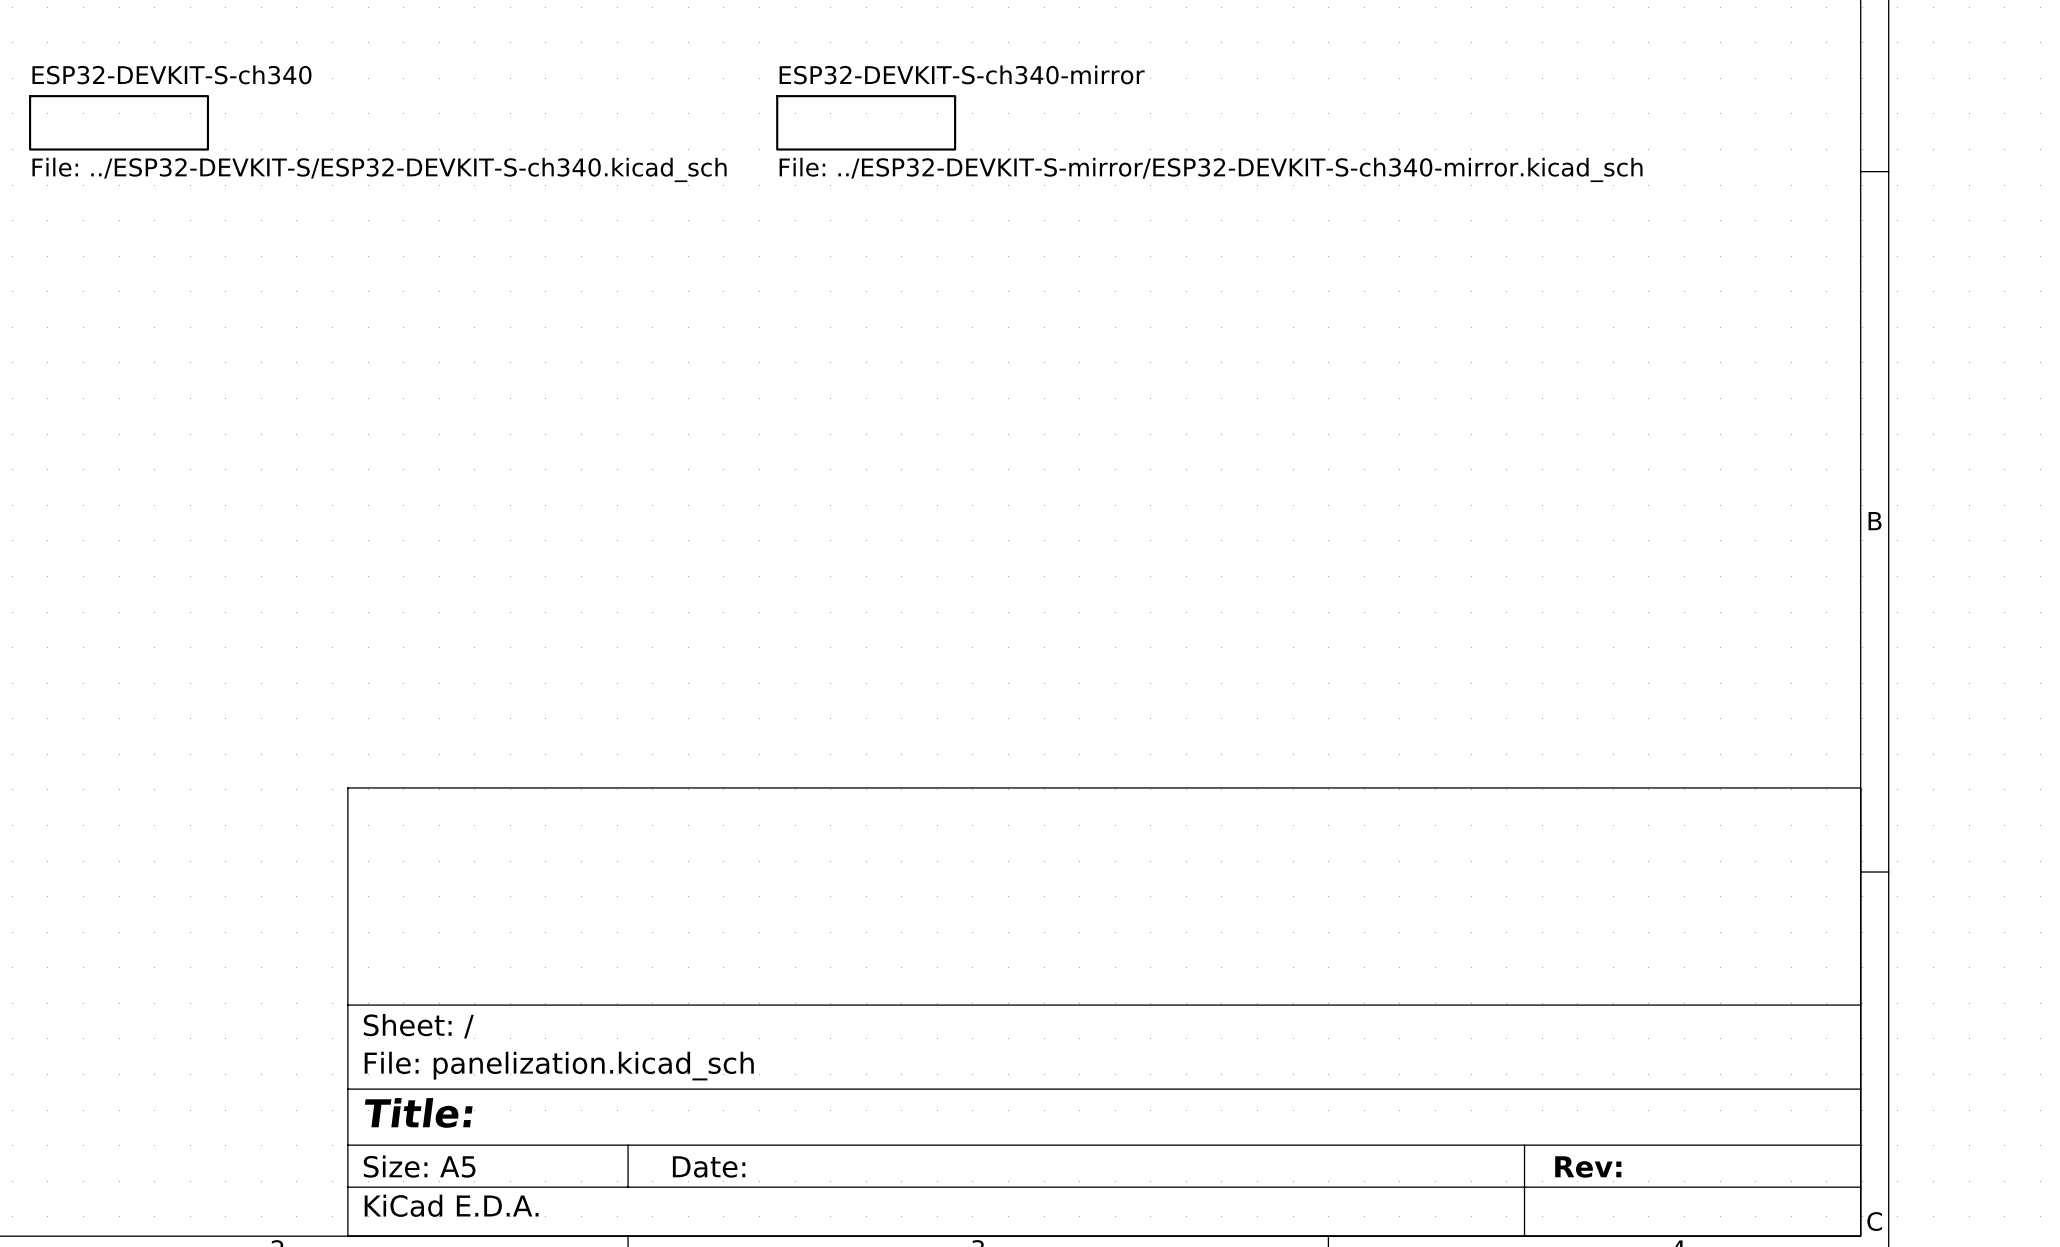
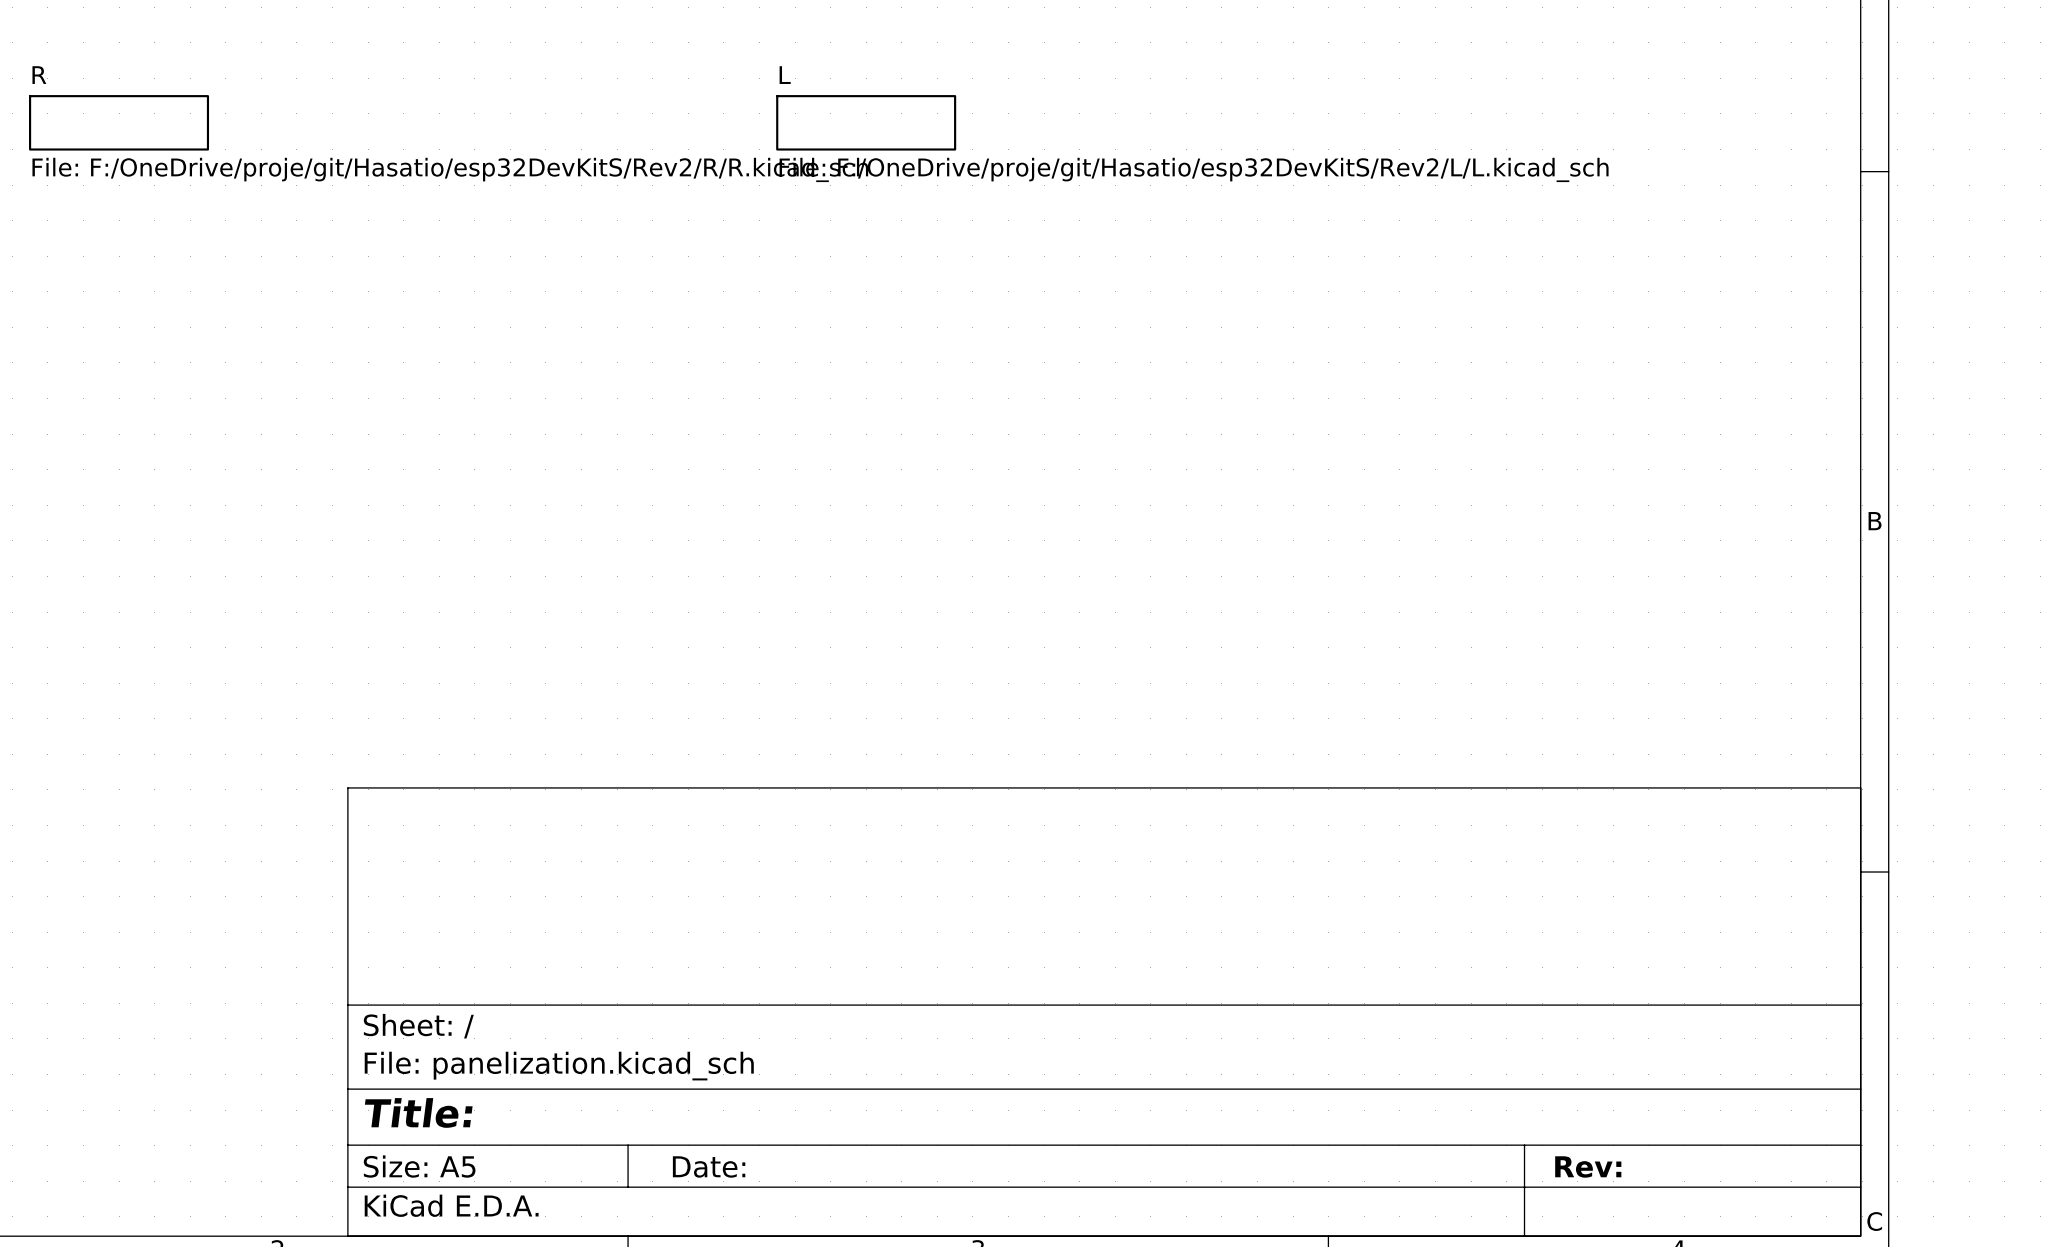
sheet ESP32-DEVKIT-S-ch340 name: ESP32-DEVKIT-S-ch340 (171, 74) -> R (39, 75)
sheet ESP32-DEVKIT-S-ch340-mirror name: ESP32-DEVKIT-S-ch340-mirror (962, 74) -> L (785, 75)
sheet ESP32-DEVKIT-S-ch340 value: File: ../ESP32-DEVKIT-S/ESP32-DEVKIT-S-ch340.kicad_sch (379, 169) -> File: F:/OneDrive/proje/git/Hasatio/esp32DevKitS/Rev2/R/R.kicad_sch (450, 169)
sheet ESP32-DEVKIT-S-ch340-mirror value: File: ../ESP32-DEVKIT-S-mirror/ESP32-DEVKIT-S-ch340-mirror.kicad_sch (1211, 169) -> File: F:/OneDrive/proje/git/Hasatio/esp32DevKitS/Rev2/L/L.kicad_sch (1194, 169)

